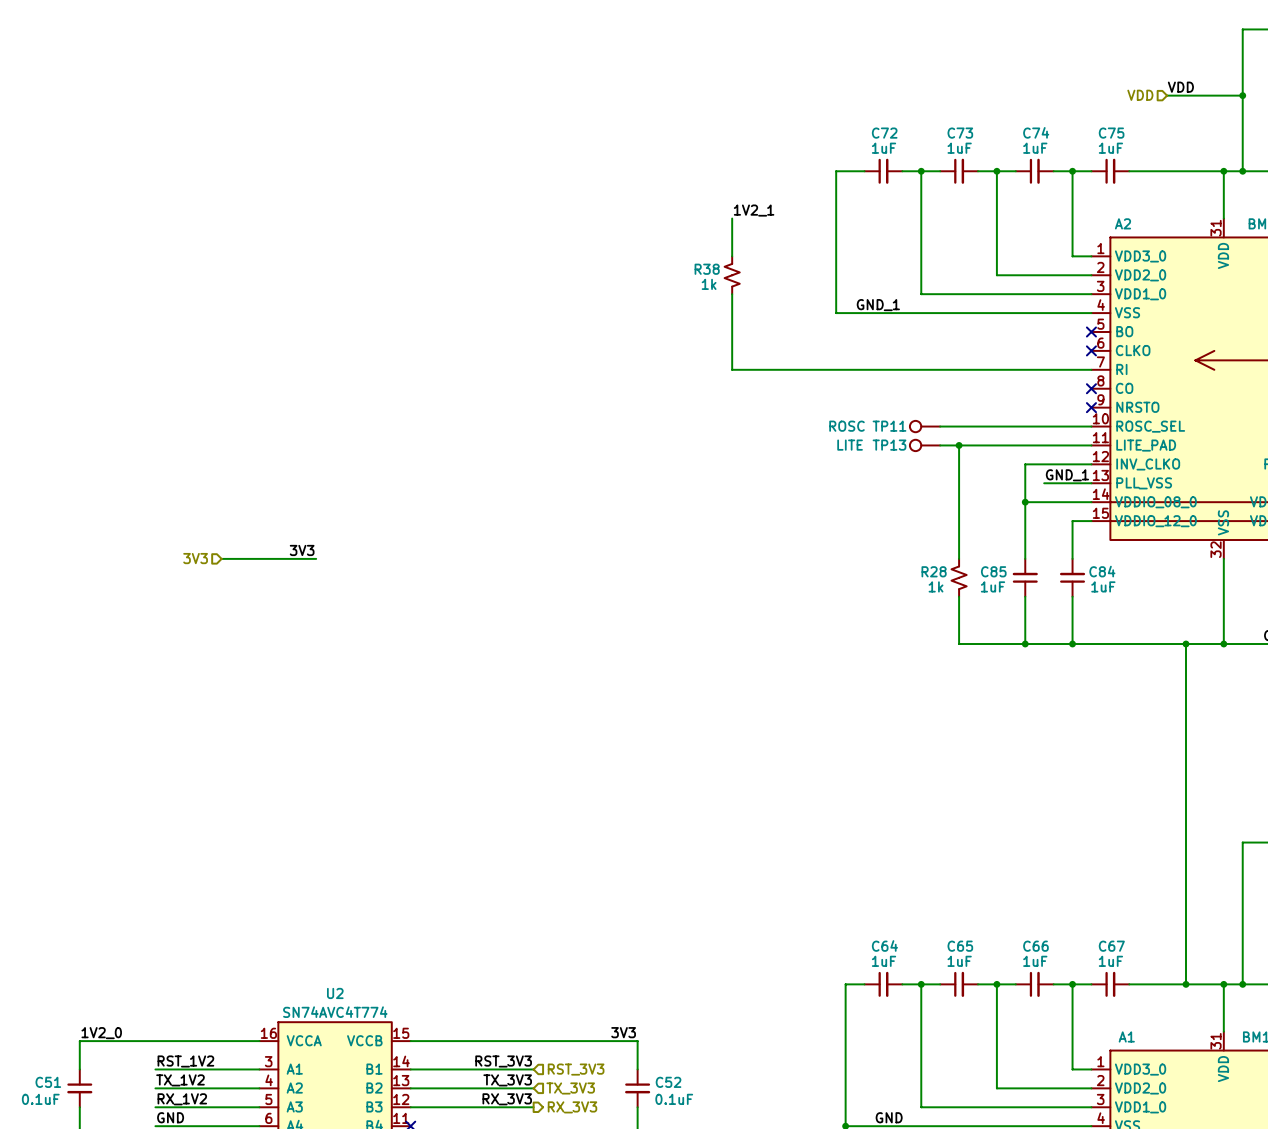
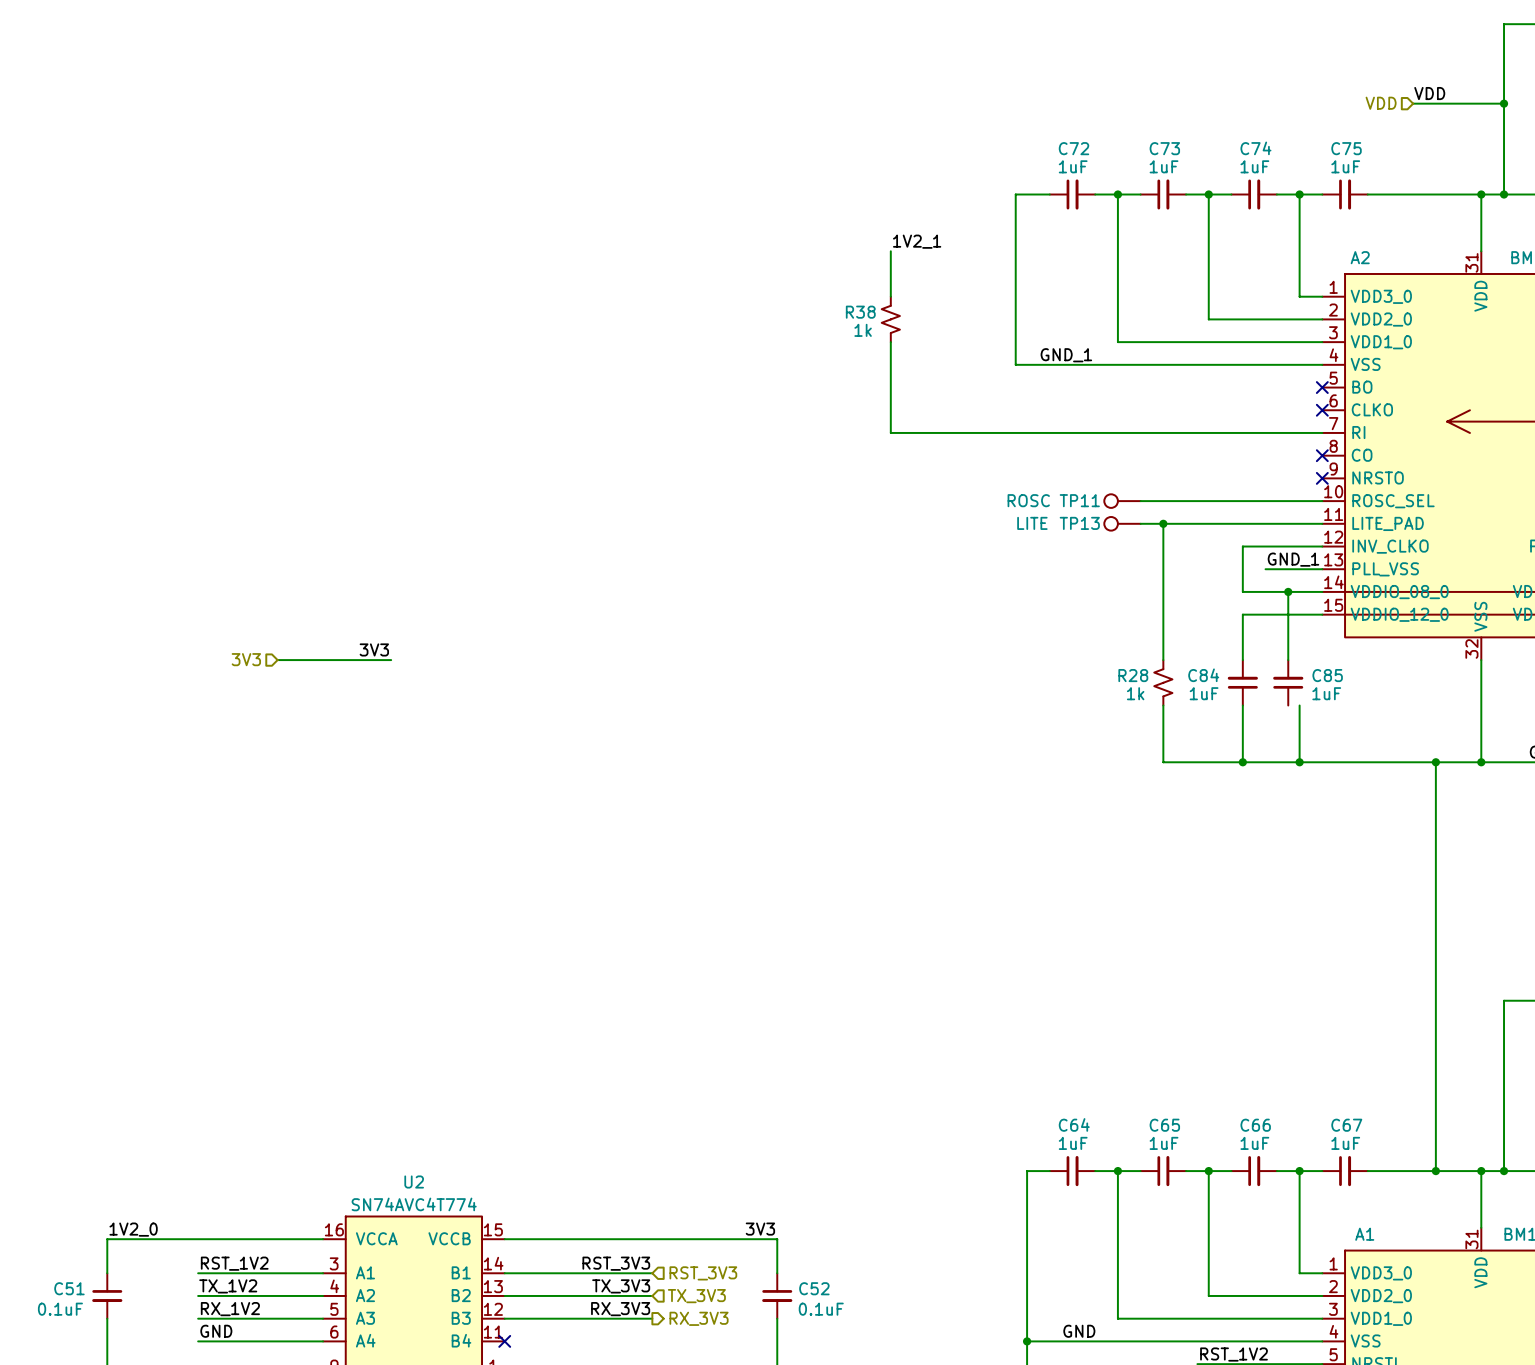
wire: (1025, 502) (1025, 521) -> (1299, 614) (1242, 614)
junction position: (1025, 502) -> (1288, 591)
wire: none -> (1288, 591) (1288, 660)
wire: (1072, 521) (1072, 558) -> none
C85 name: C85 (993, 571) -> C84 (1203, 675)
C85: none -> 1uF (1288, 682)
C84: 1uF (1072, 577) -> none

